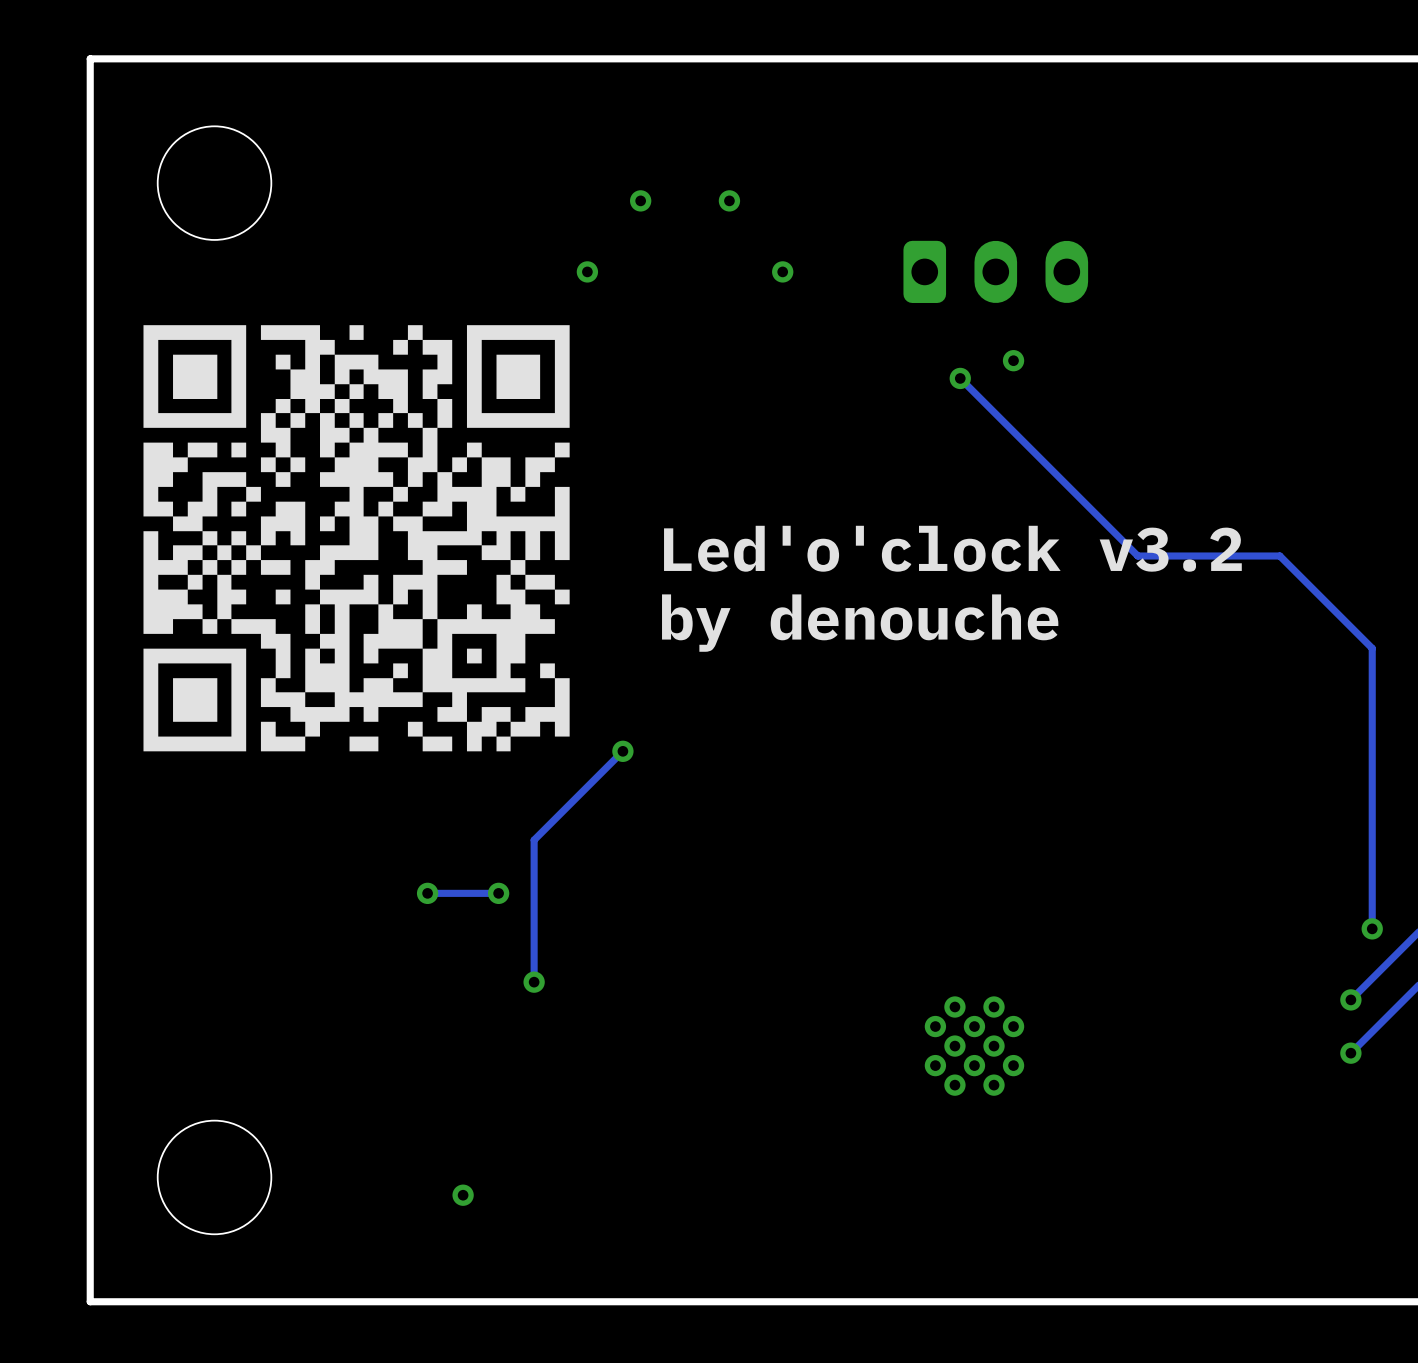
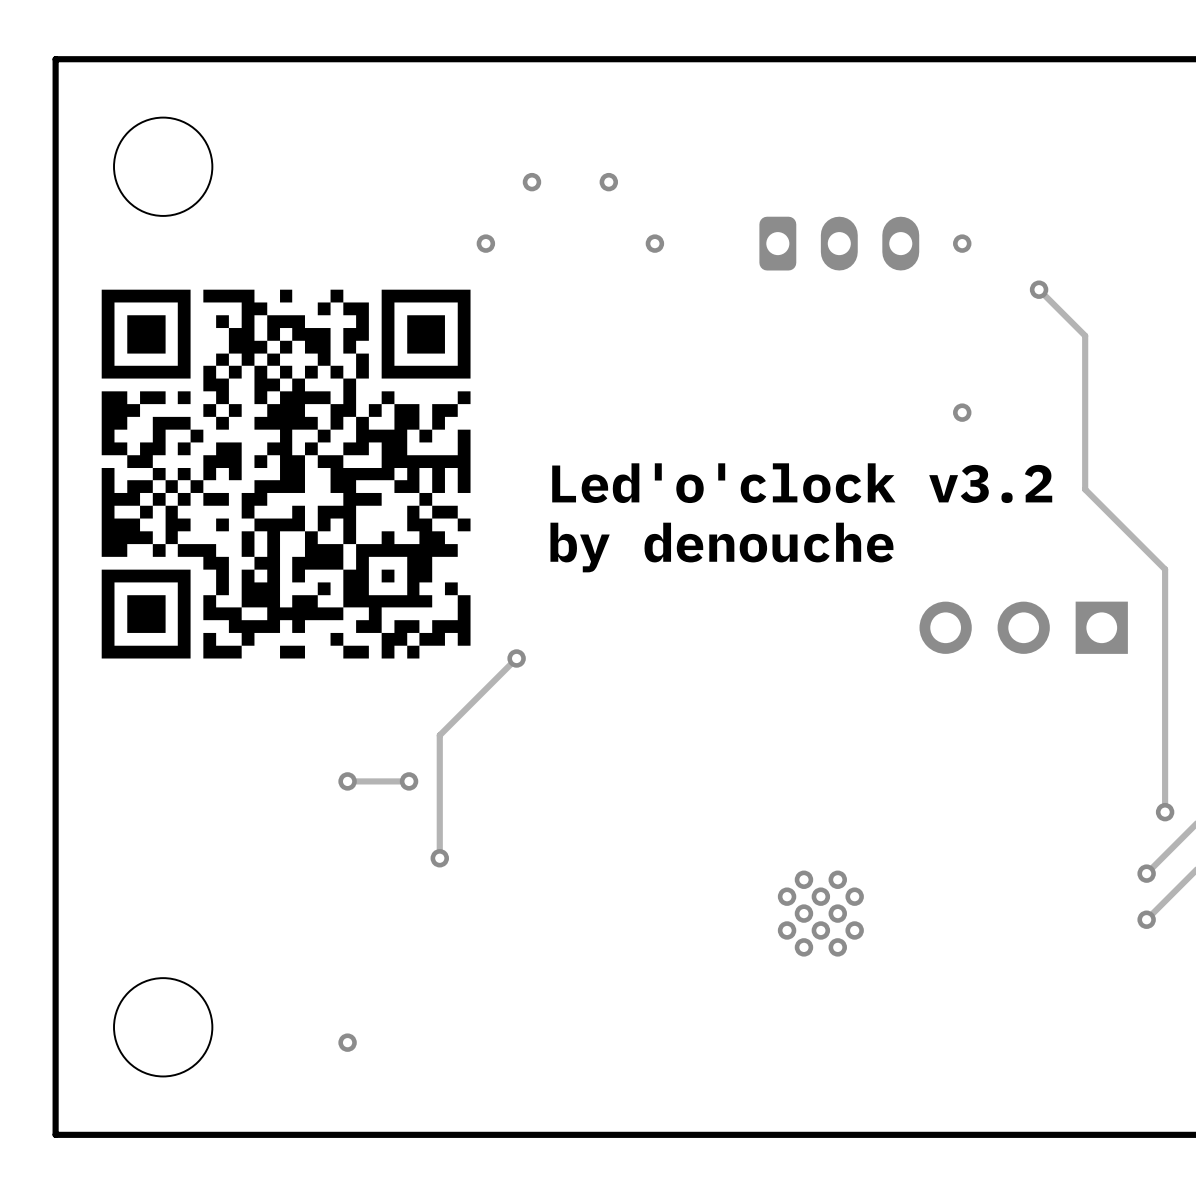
via: none -> (962, 243)
via: none -> (1039, 289)
via: (1013, 360) -> none
track: (960, 378) (1137, 556) (1279, 556) -> (1039, 289) (1085, 335) (1085, 489)
via: (960, 378) -> none
via: none -> (962, 412)
part: none -> (1023, 627)
via position: (463, 1195) -> (347, 1042)

